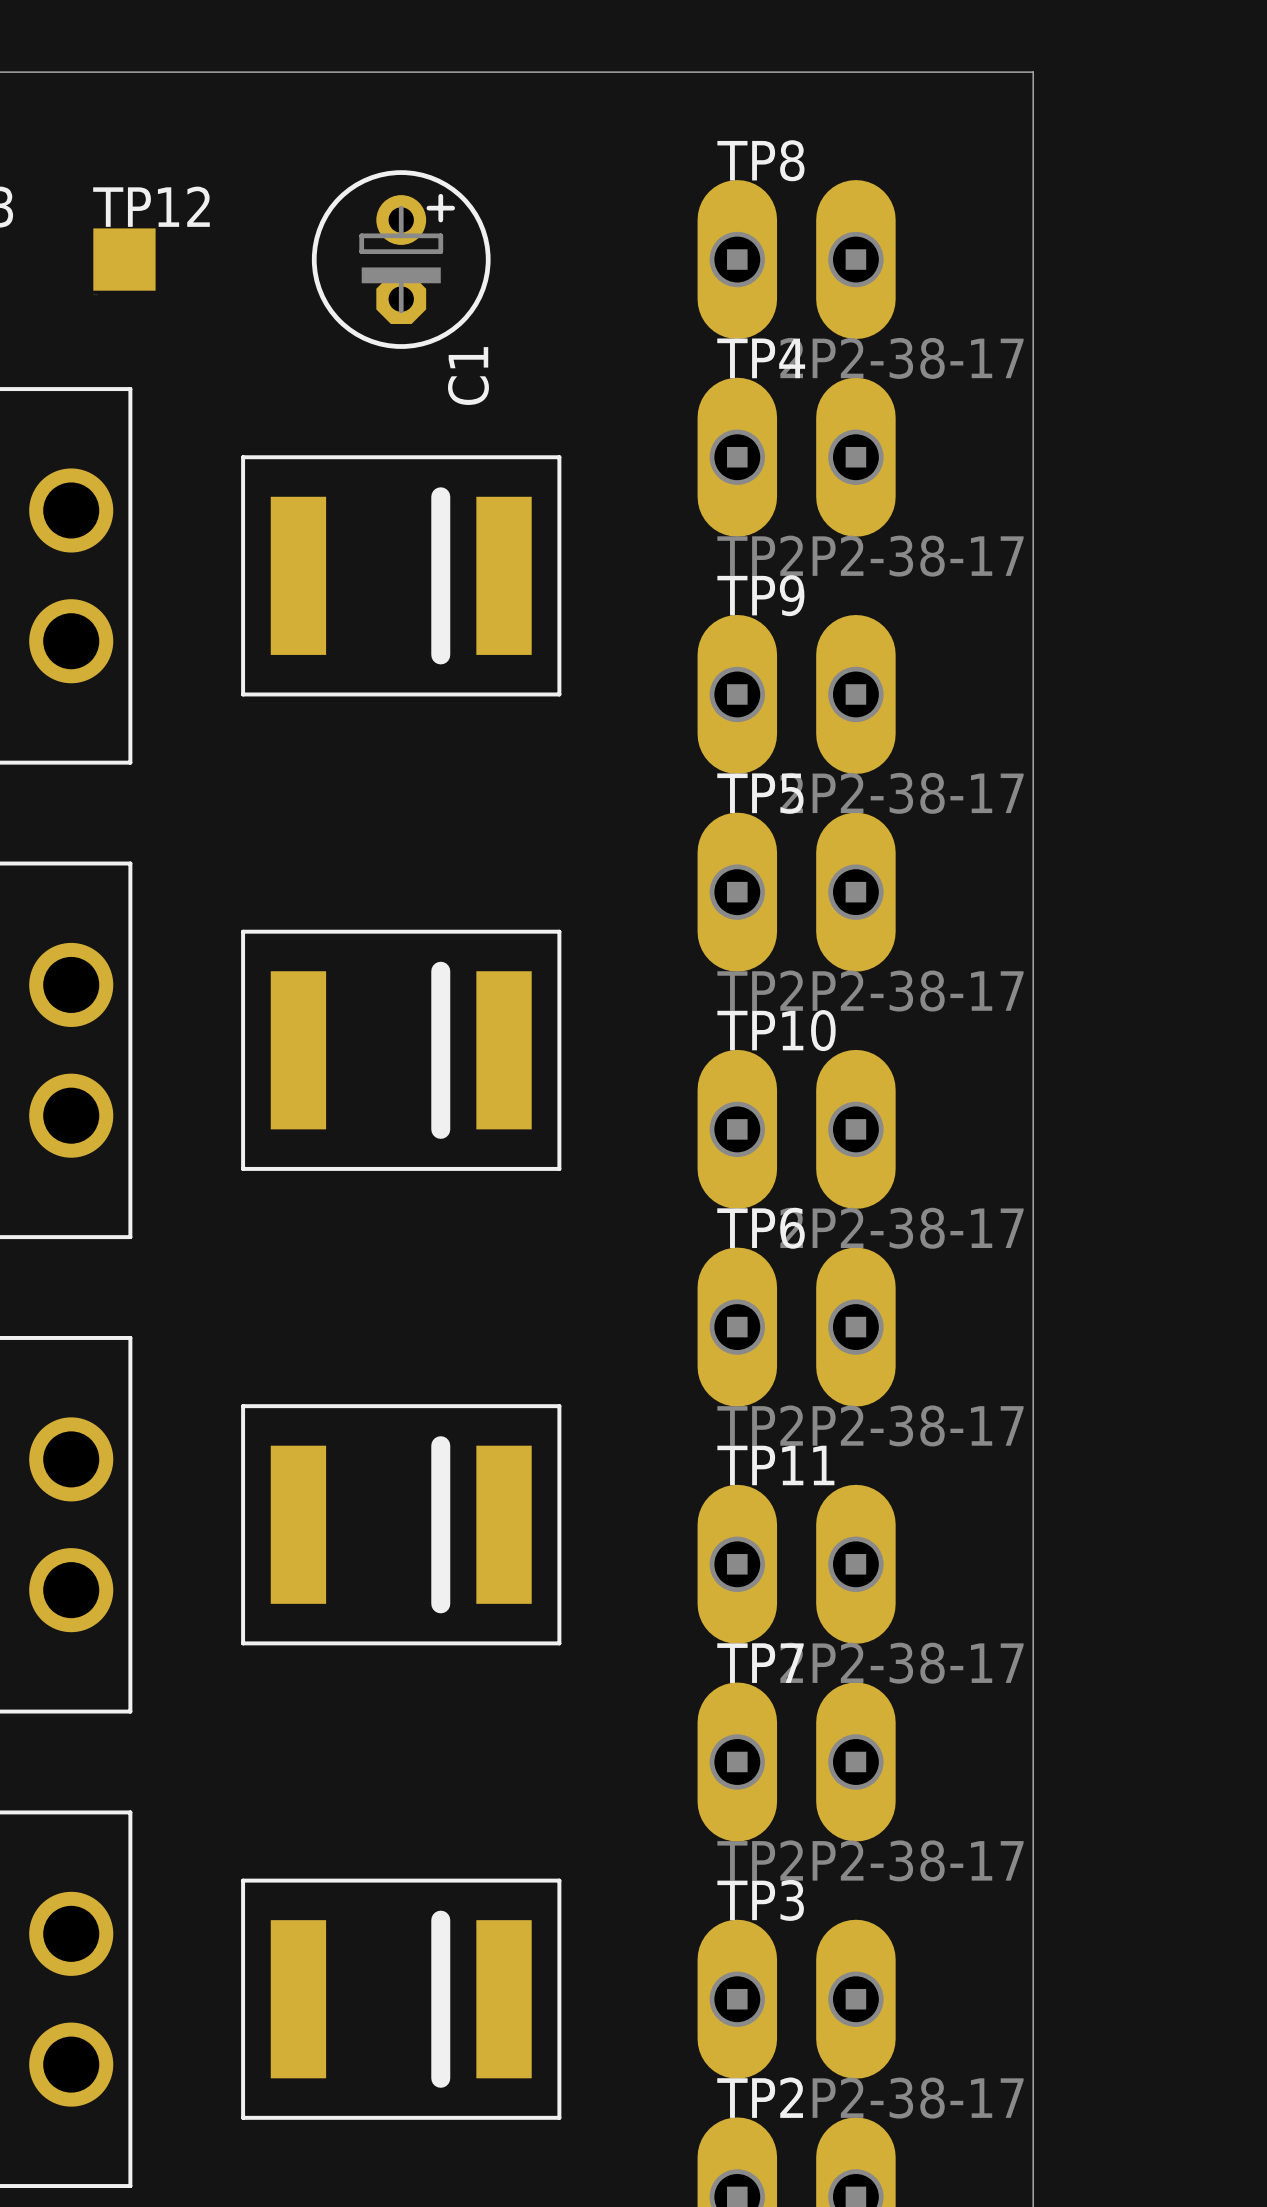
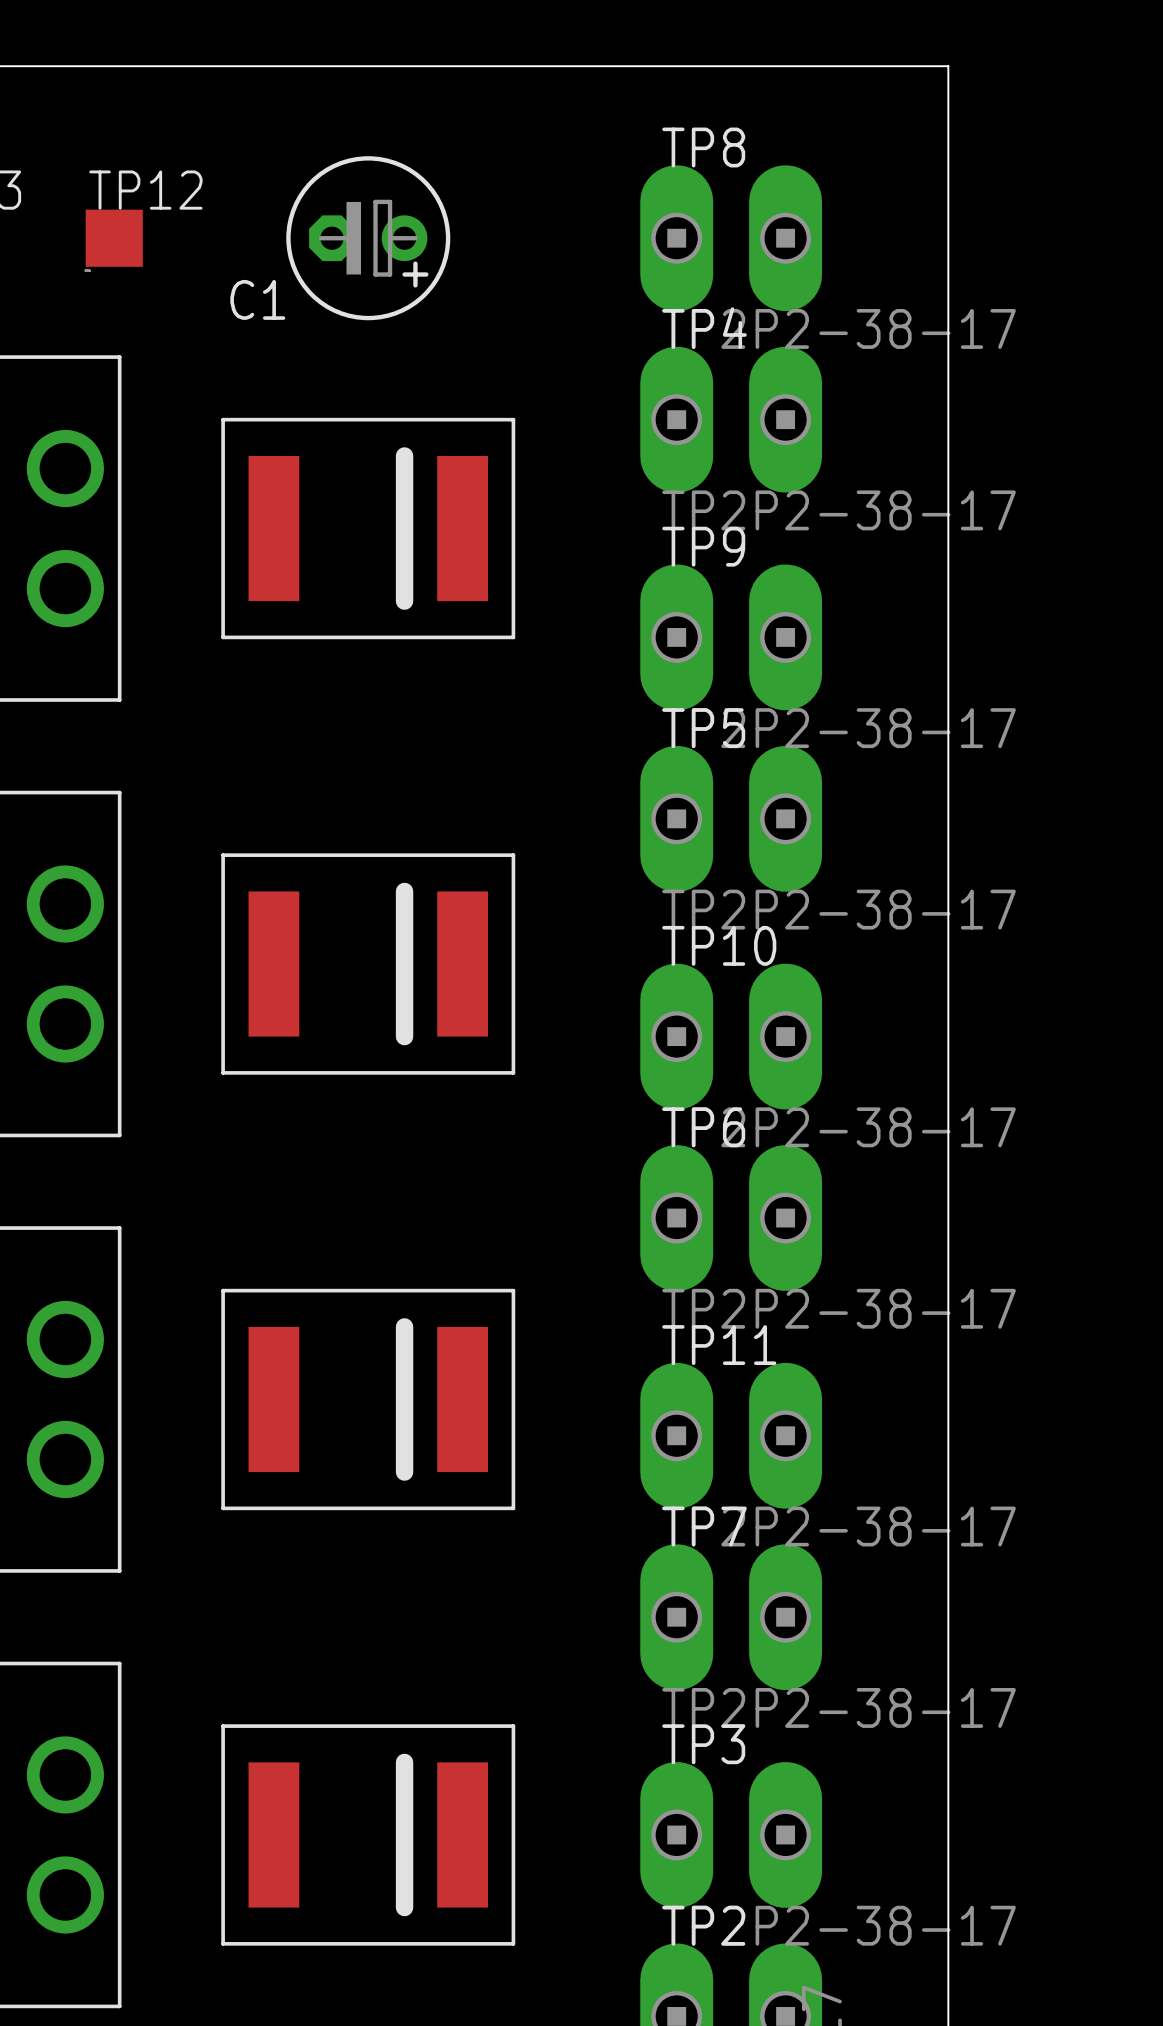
C1 rotation: 0° (401, 259) -> 90° clockwise (368, 238)

